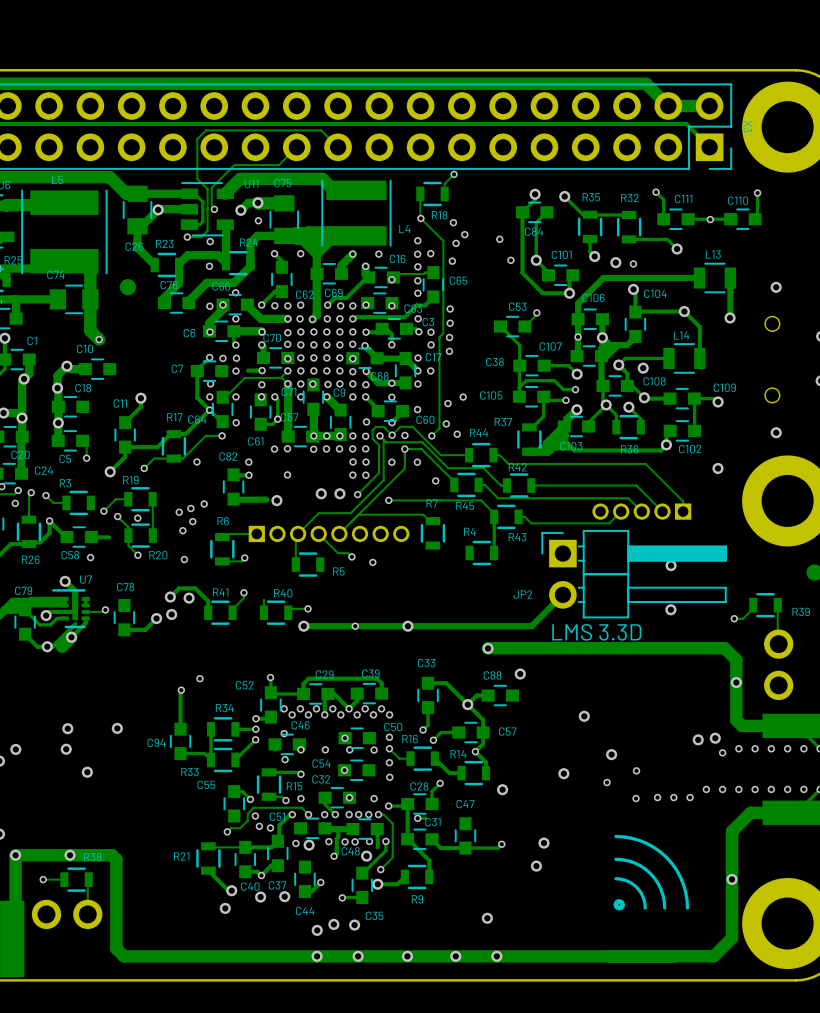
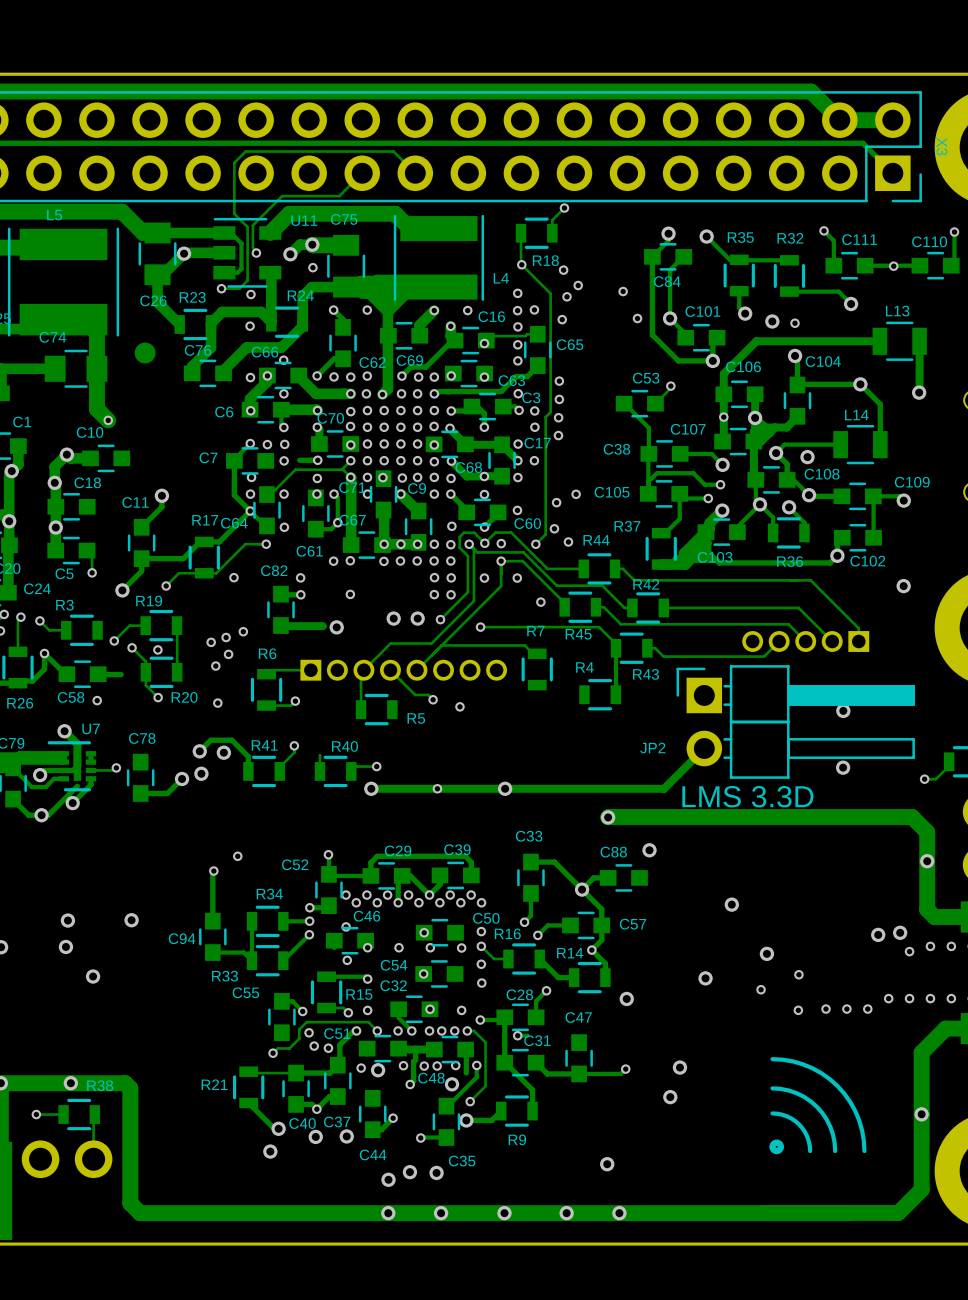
track: (71, 637) (62, 646) -> none

